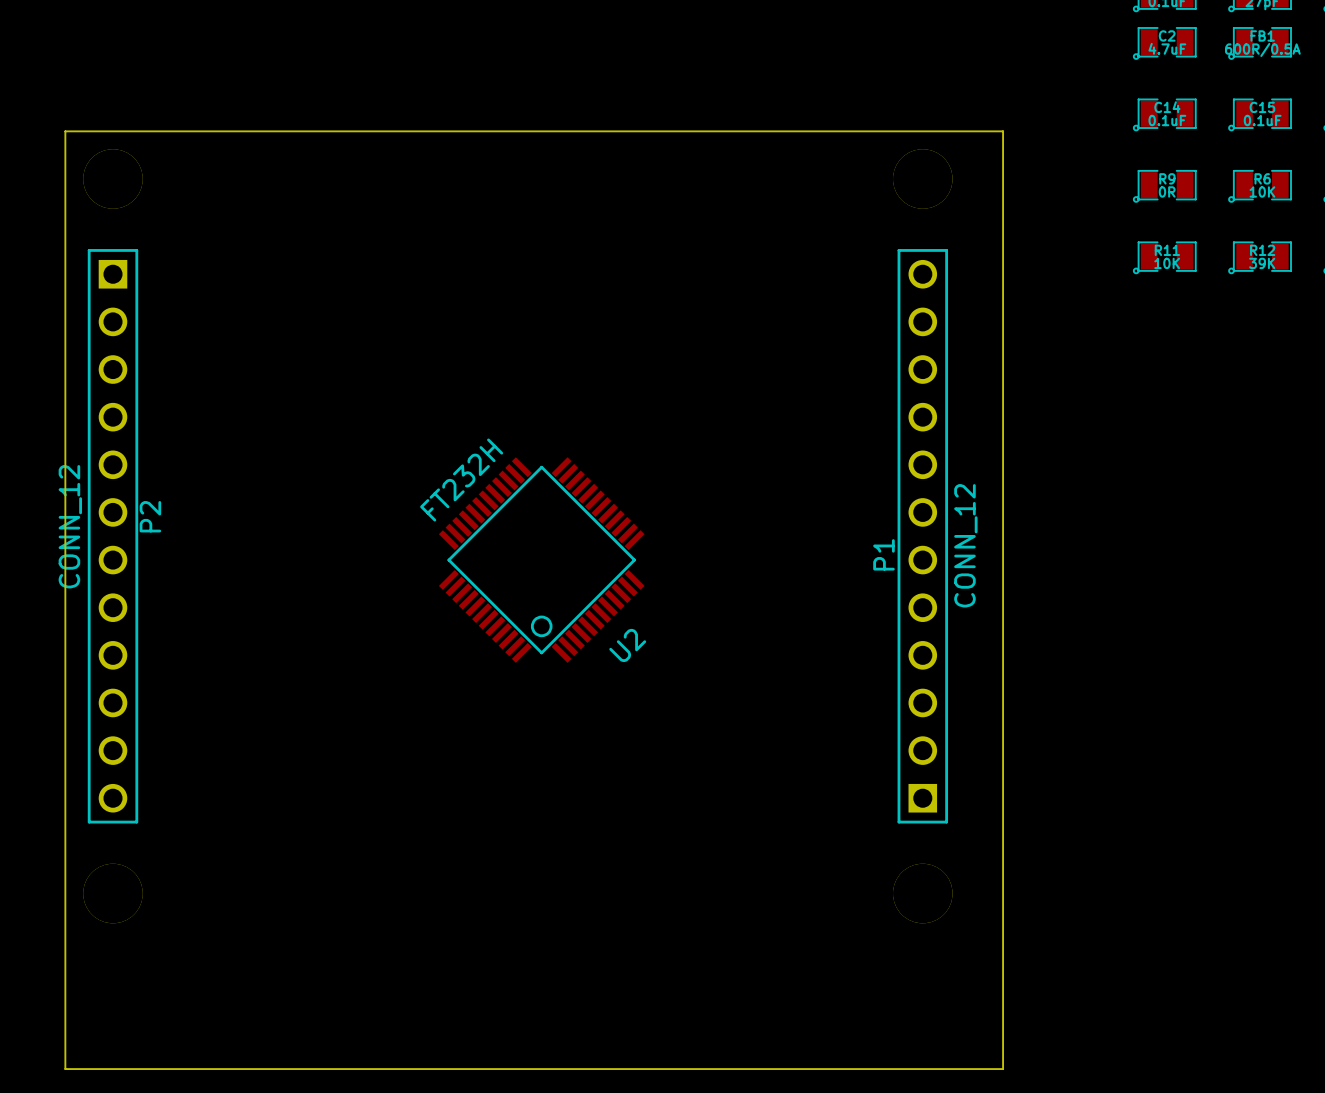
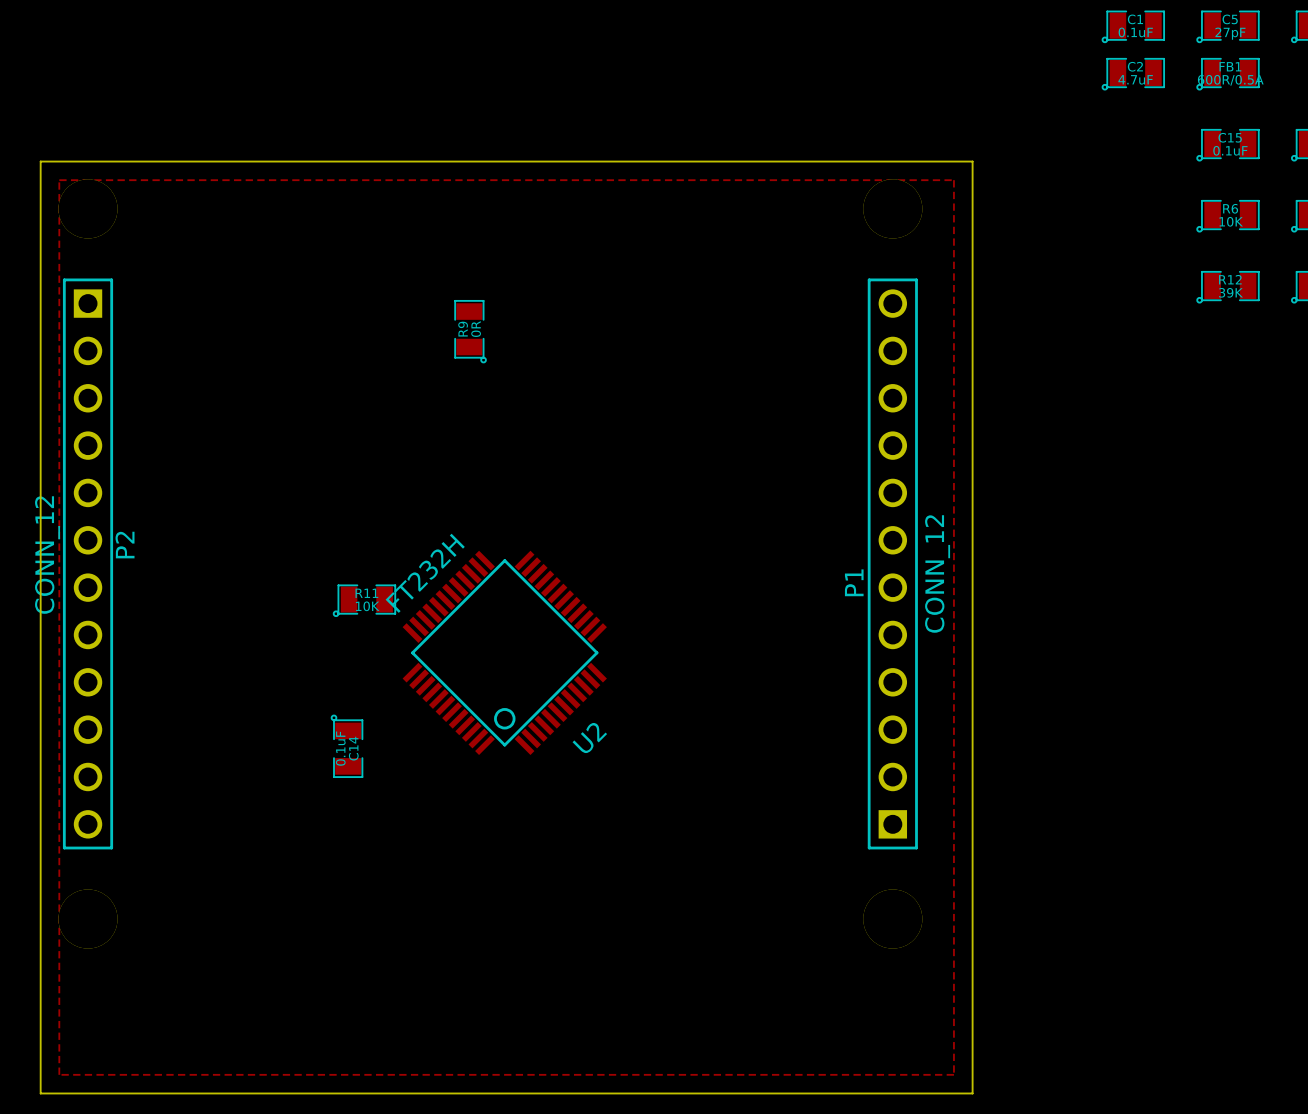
C14 rotation: 0° (1164, 114) -> 90° clockwise (347, 746)
C14 position: (1164, 114) -> (347, 746)
zone outline: none -> (59, 180) (59, 1074) (953, 1074) (953, 180) (59, 180)
R9 rotation: 0° (1164, 186) -> 90° counterclockwise (470, 331)
R9 position: (1164, 186) -> (470, 331)
R11 position: (1164, 257) -> (364, 600)
U2 position: (541, 560) -> (504, 652)

